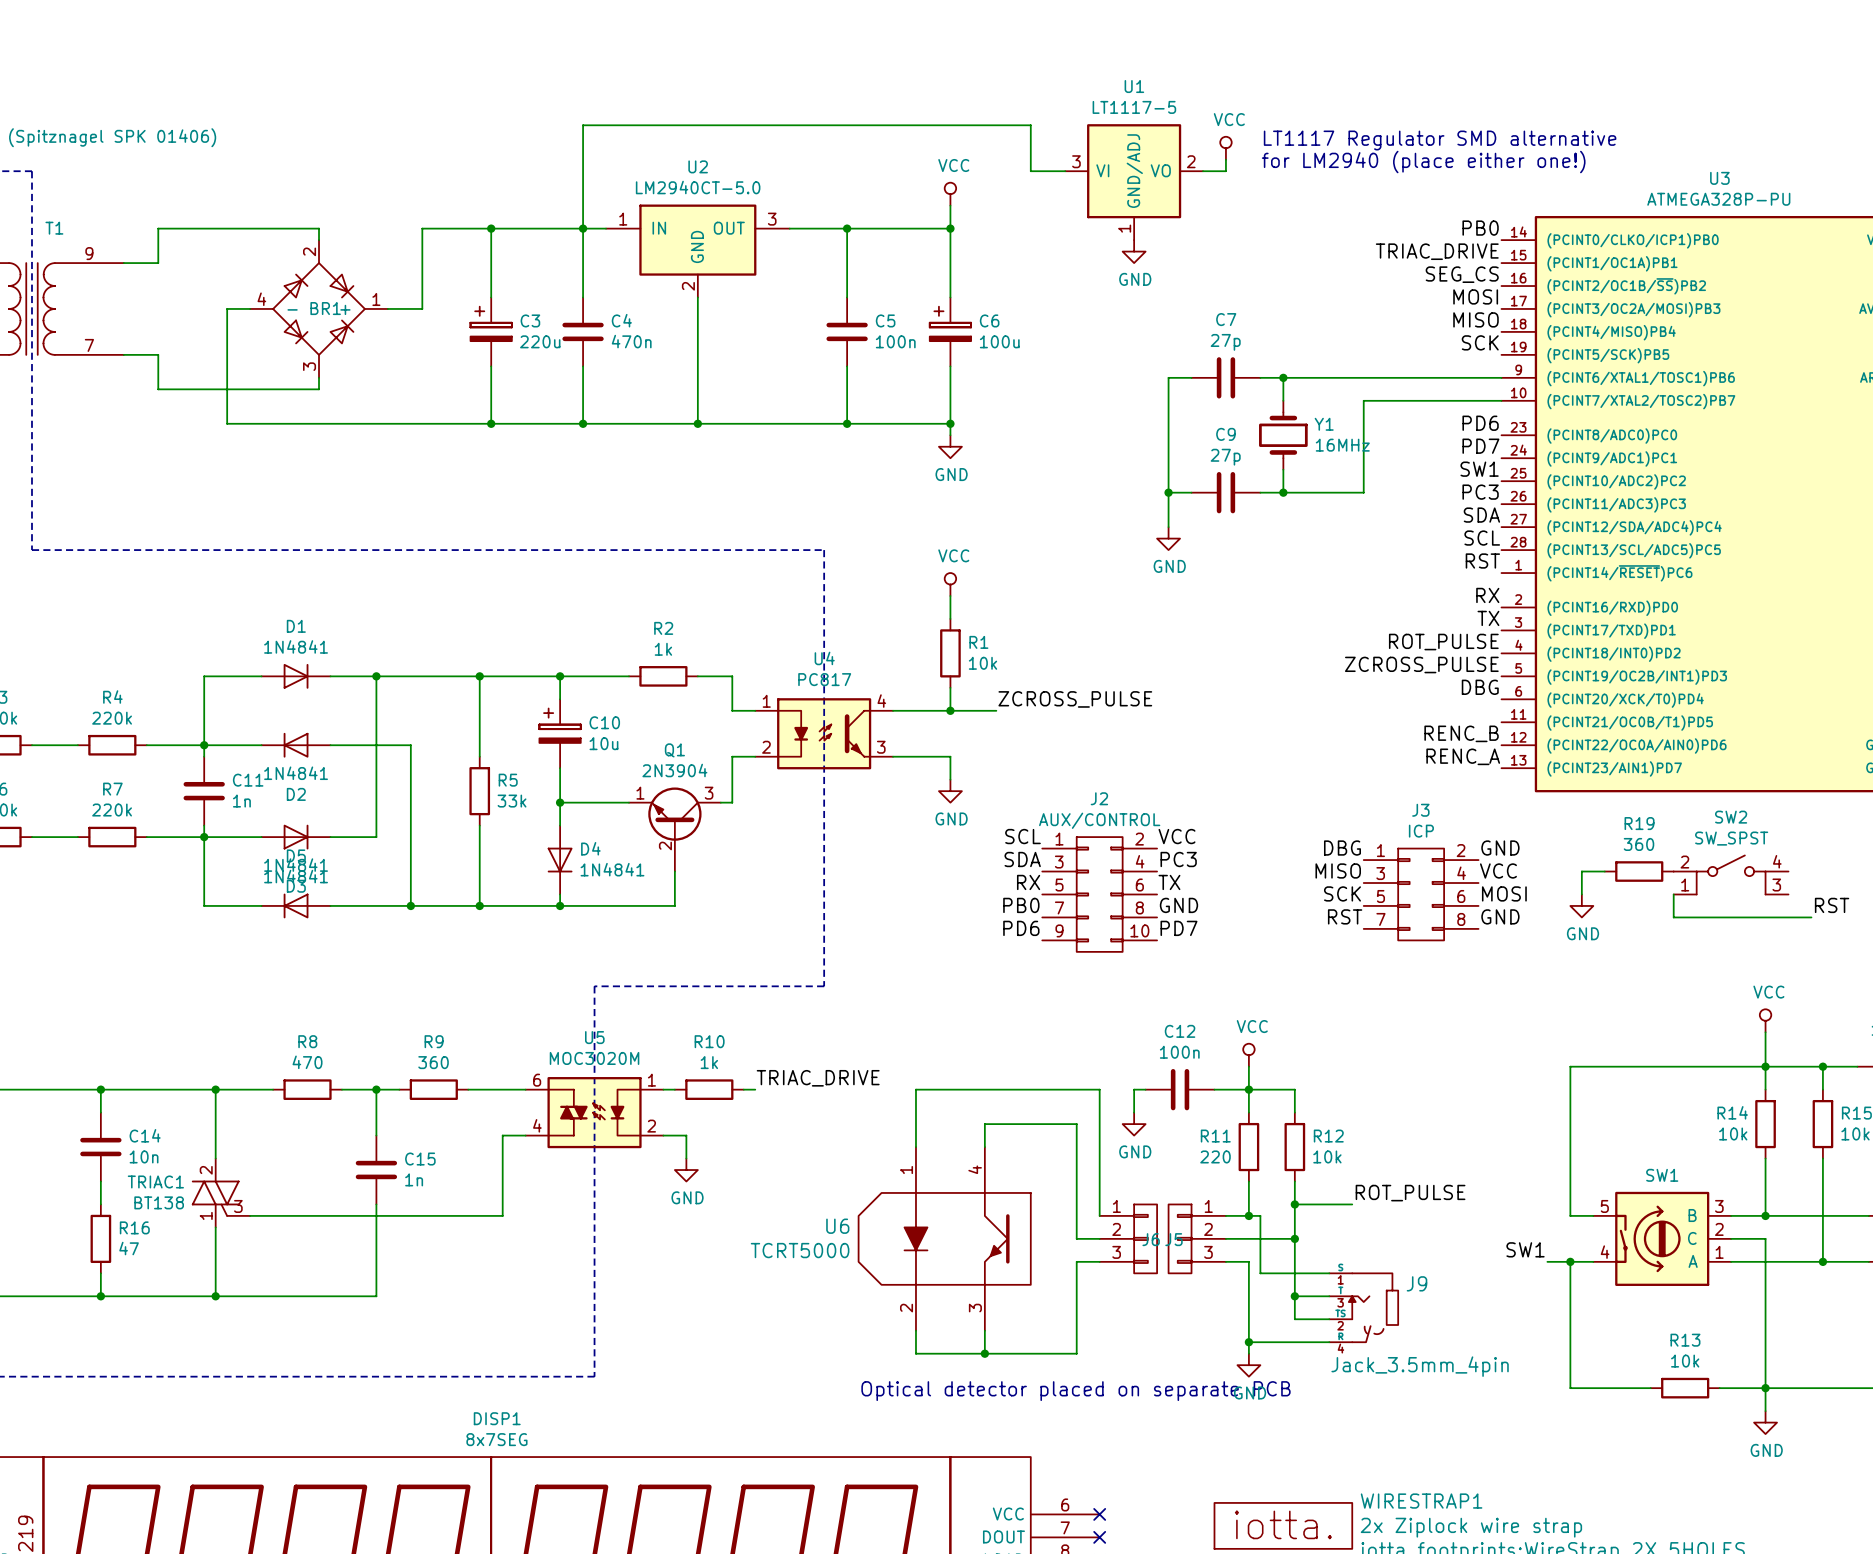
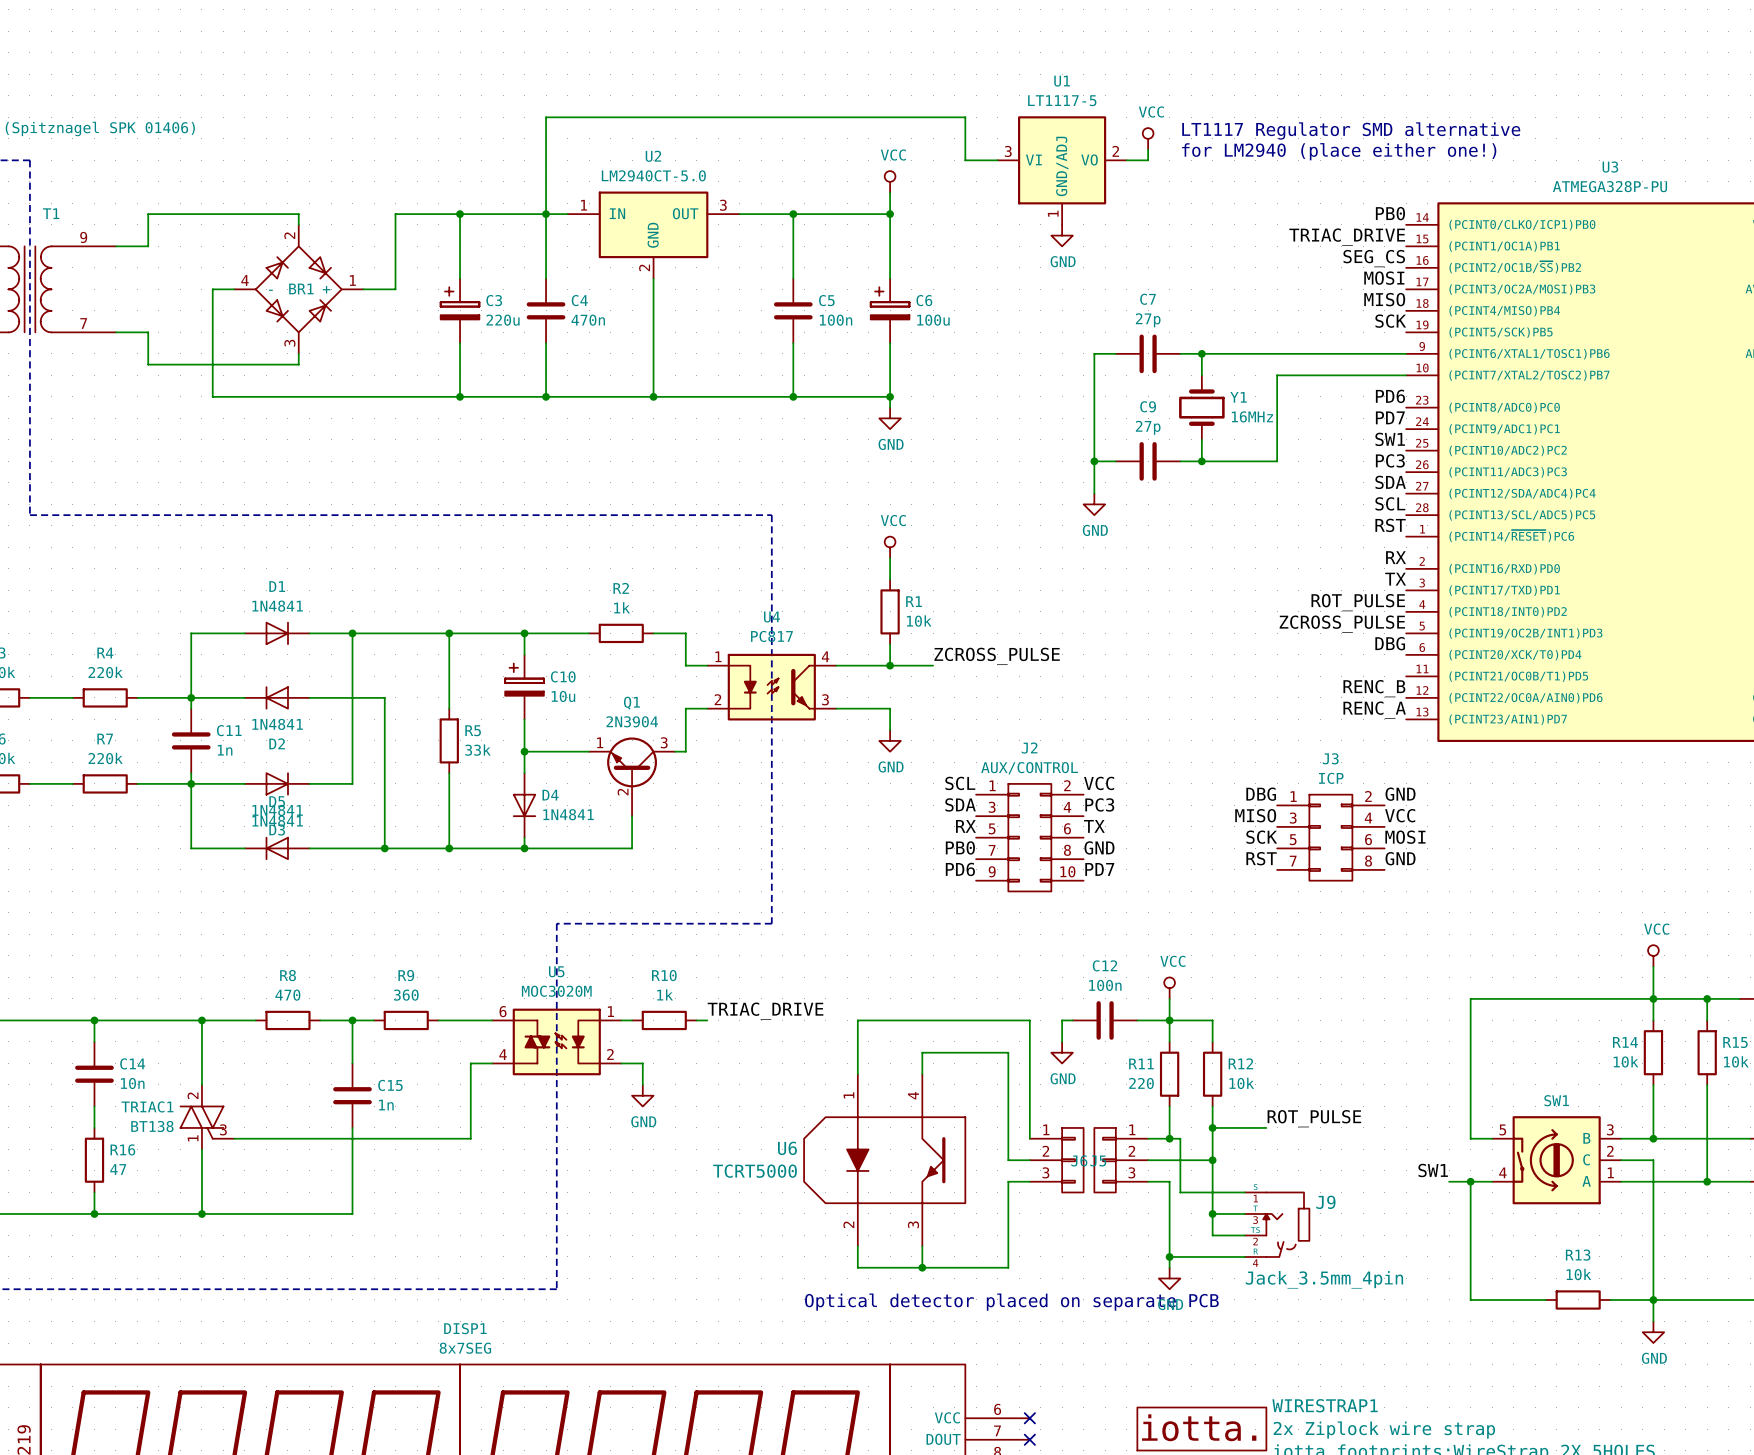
wire: (1604, 871) (1581, 871) (1581, 894) -> none
R19: 360 (1639, 871) -> none
SW2: SW_SPST (1731, 874) -> none
wire: (1673, 894) (1673, 917) (1811, 917) -> none
power symbol: GND (1581, 905) -> none
label: RST (1832, 905) -> none

